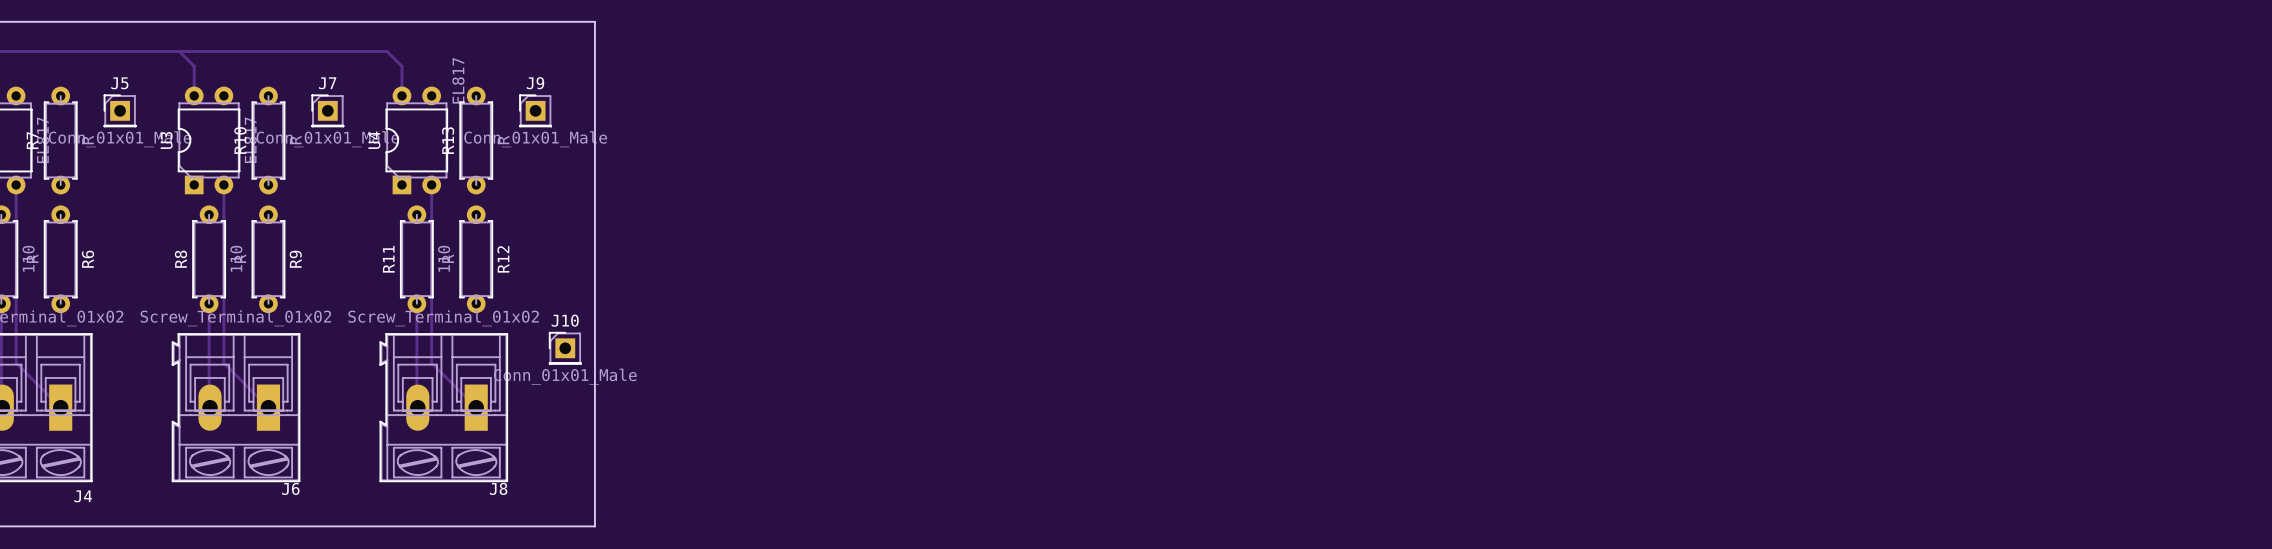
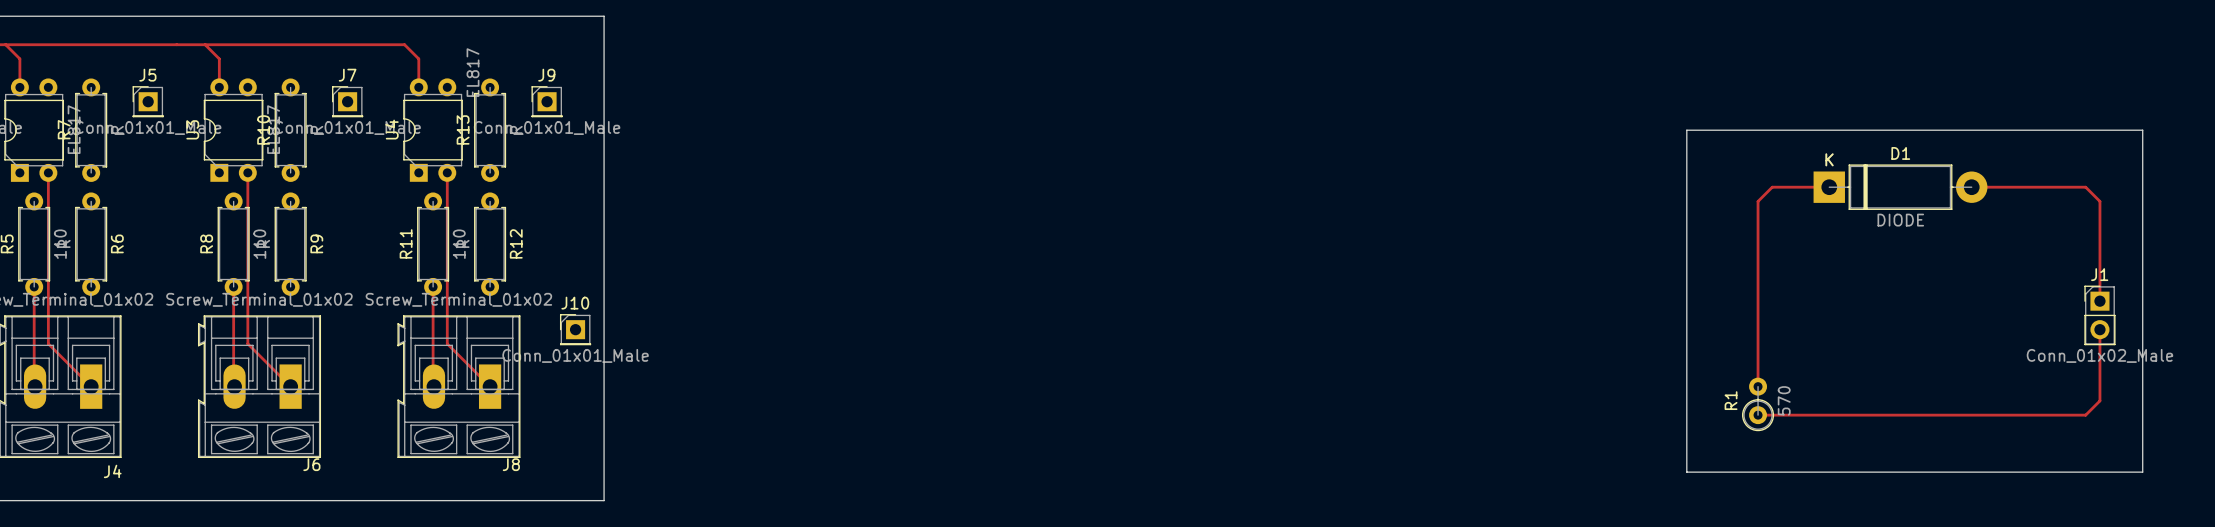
board edge: none -> (1686, 130) (1686, 472) (2142, 472) (2142, 130) (1686, 130)
track: none -> (1829, 187) (1772, 187) (1758, 201) (1758, 386)
D1: none -> DIODE (1900, 187)
track: none -> (1971, 187) (2085, 187) (2099, 201) (2099, 301)
J1: none -> Conn_01x02_Male (2099, 315)
track: none -> (2099, 329) (2099, 400) (2085, 415) (1758, 415)
R1: none -> 570 (1758, 404)

